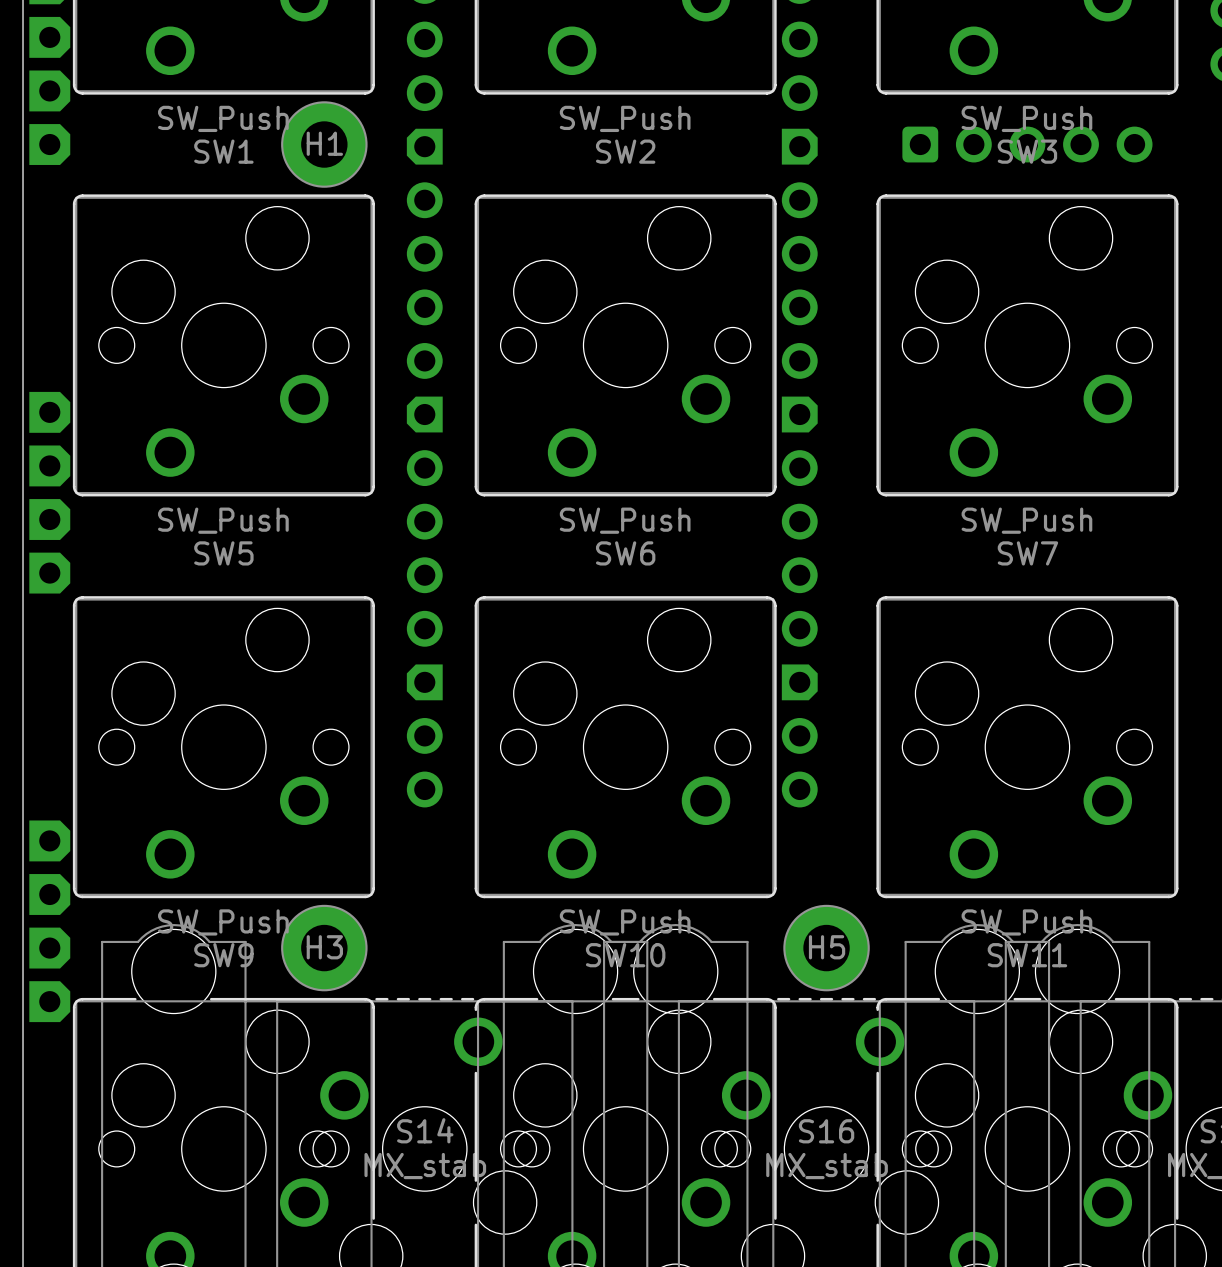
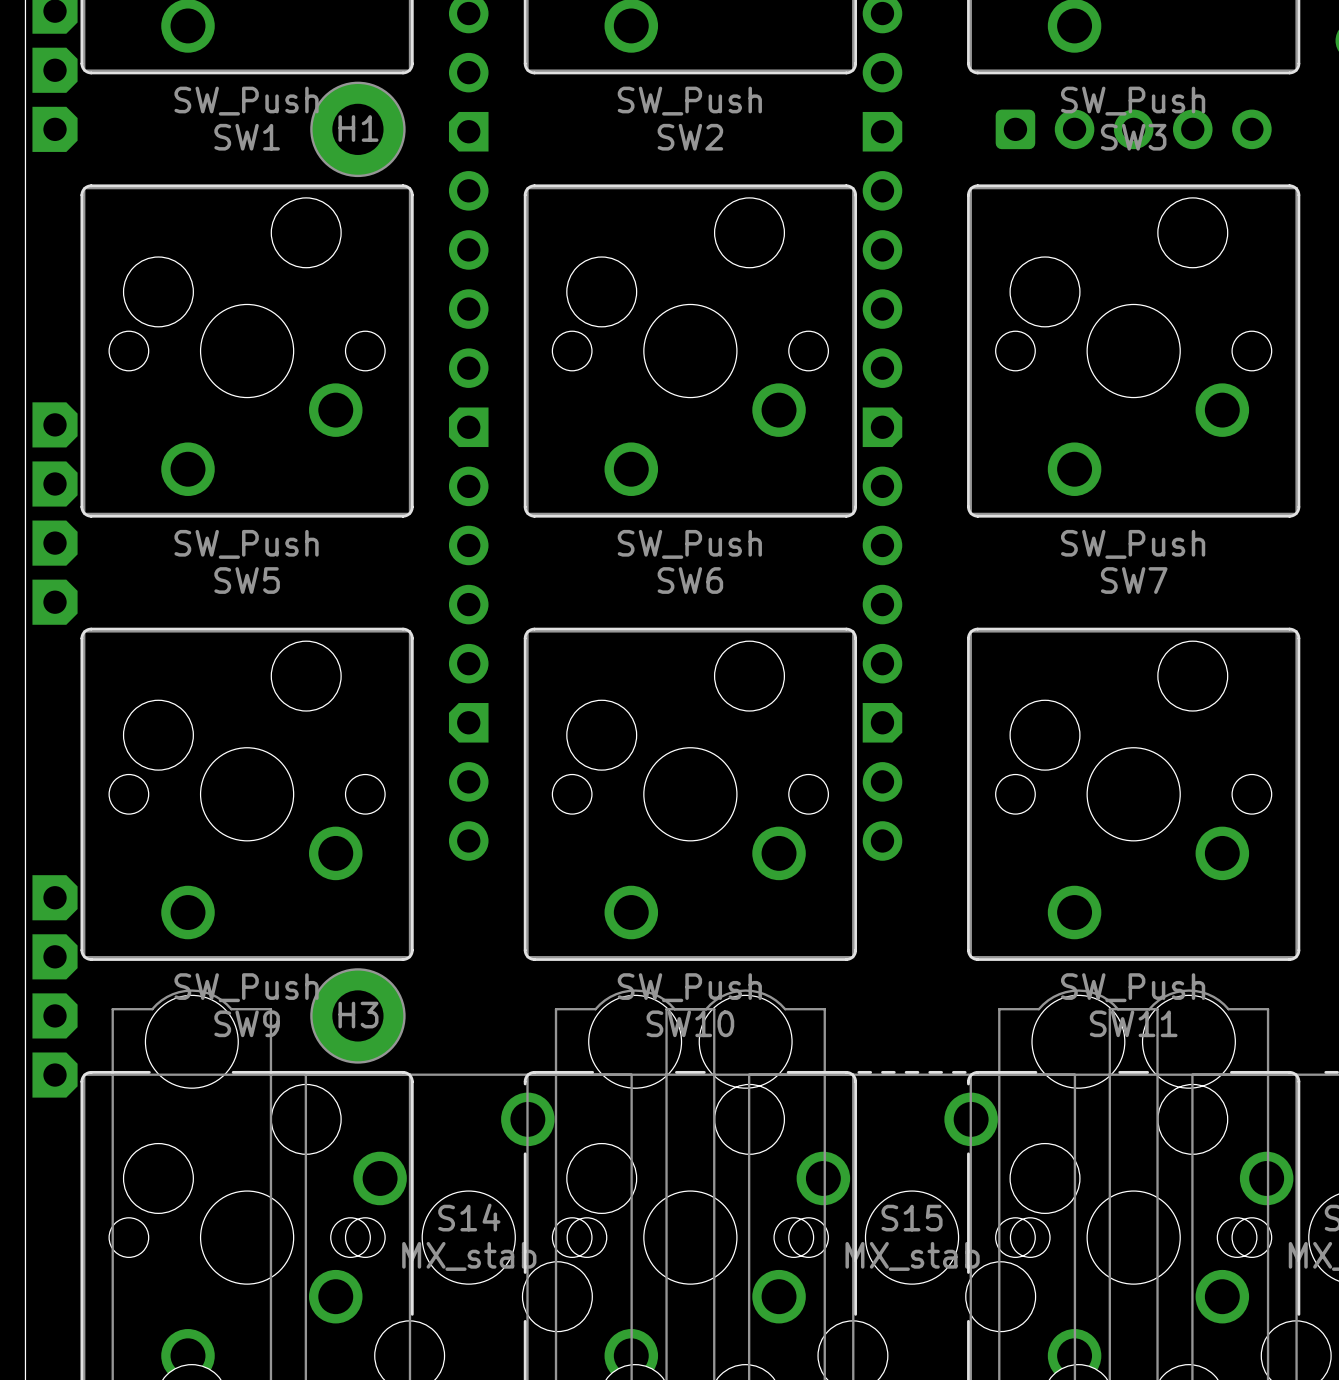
H5: (826, 948) -> none
line: (376, 999) (387, 999) -> none
line: (397, 999) (408, 999) -> none
line: (419, 999) (430, 999) -> none
line: (440, 999) (451, 999) -> none
line: (462, 999) (472, 999) -> none
line: (1180, 999) (1190, 999) -> none
S16 name: S16 (826, 1131) -> S15 (912, 1218)

